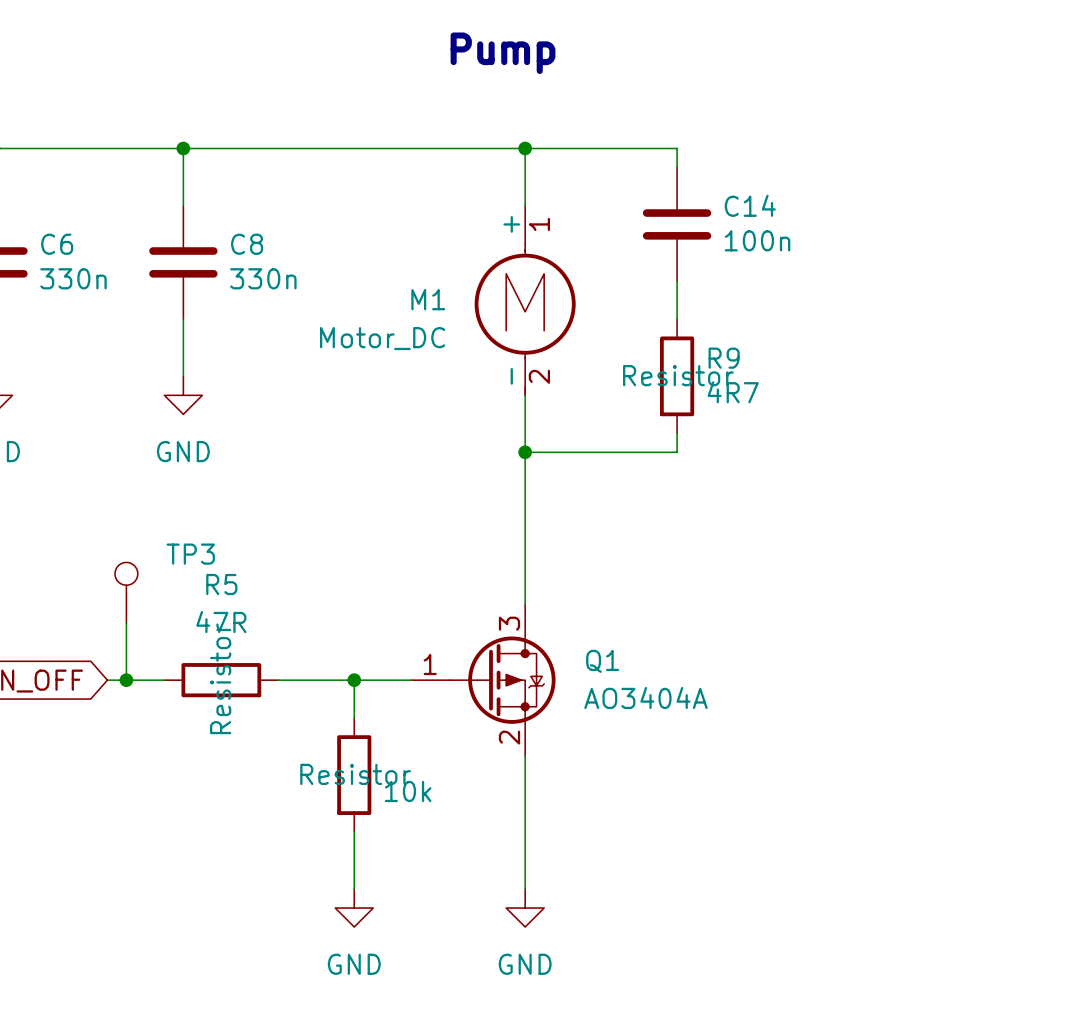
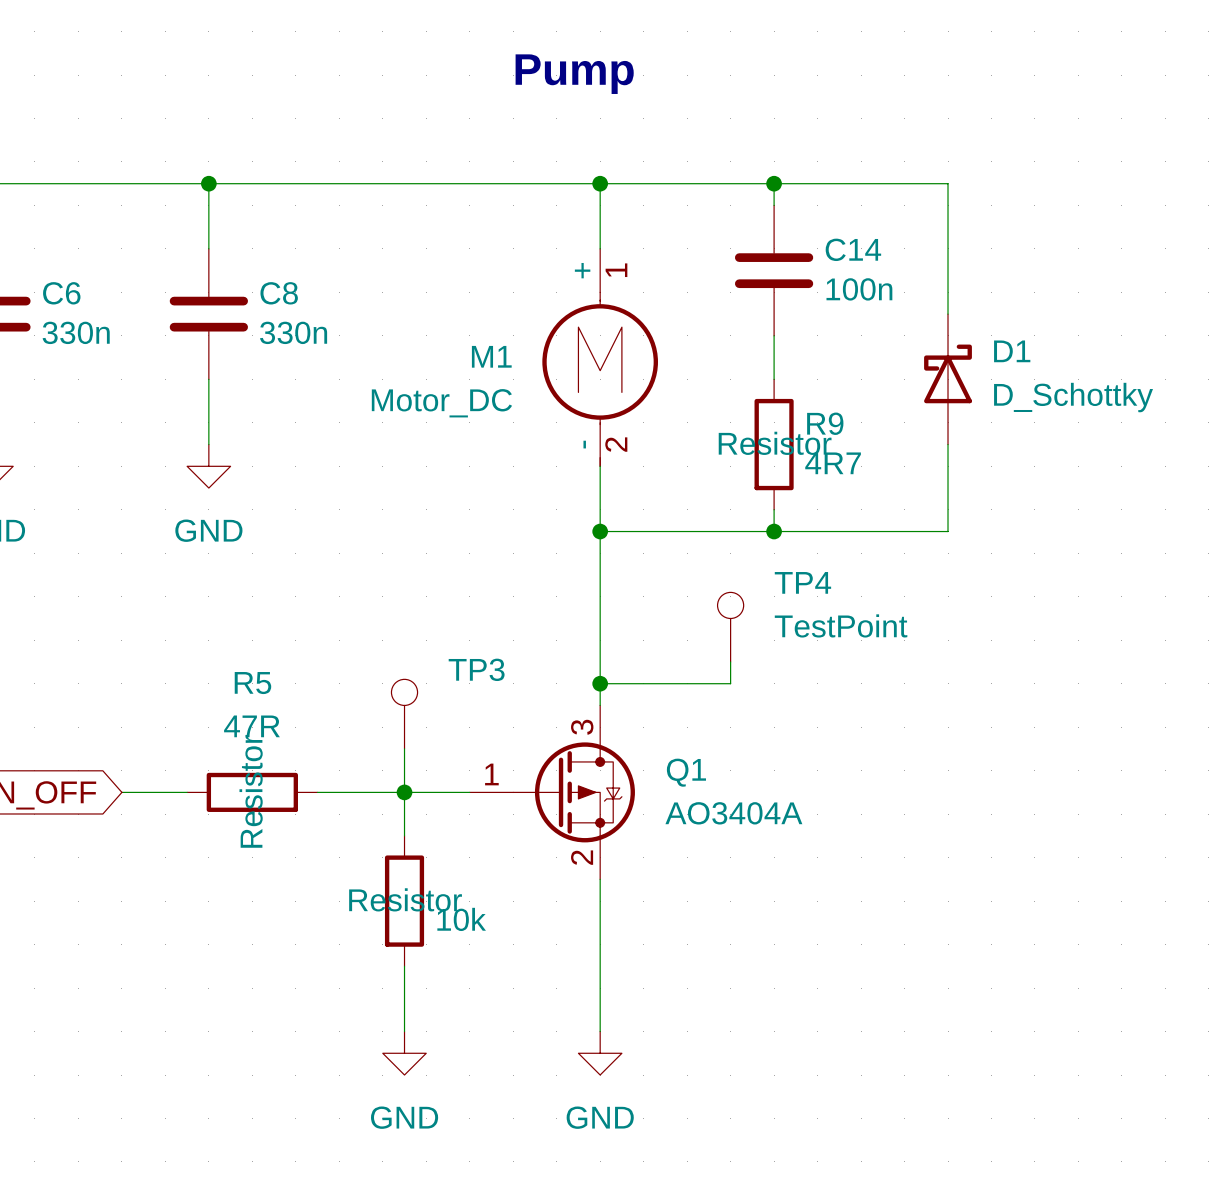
wire: none -> (774, 183) (948, 183) (948, 314)
junction: none -> (774, 183)
D1: none -> D_Schottky (948, 379)
wire: none -> (948, 444) (948, 531) (774, 531)
junction: none -> (774, 531)
TP4: none -> TestPoint (730, 627)
wire: none -> (730, 661) (730, 683) (600, 683)
junction: none -> (600, 683)
TP3 position: (126, 592) -> (404, 714)
wire: (126, 623) (126, 680) -> none
wire: none -> (404, 748) (404, 792)
junction: (126, 680) -> none

